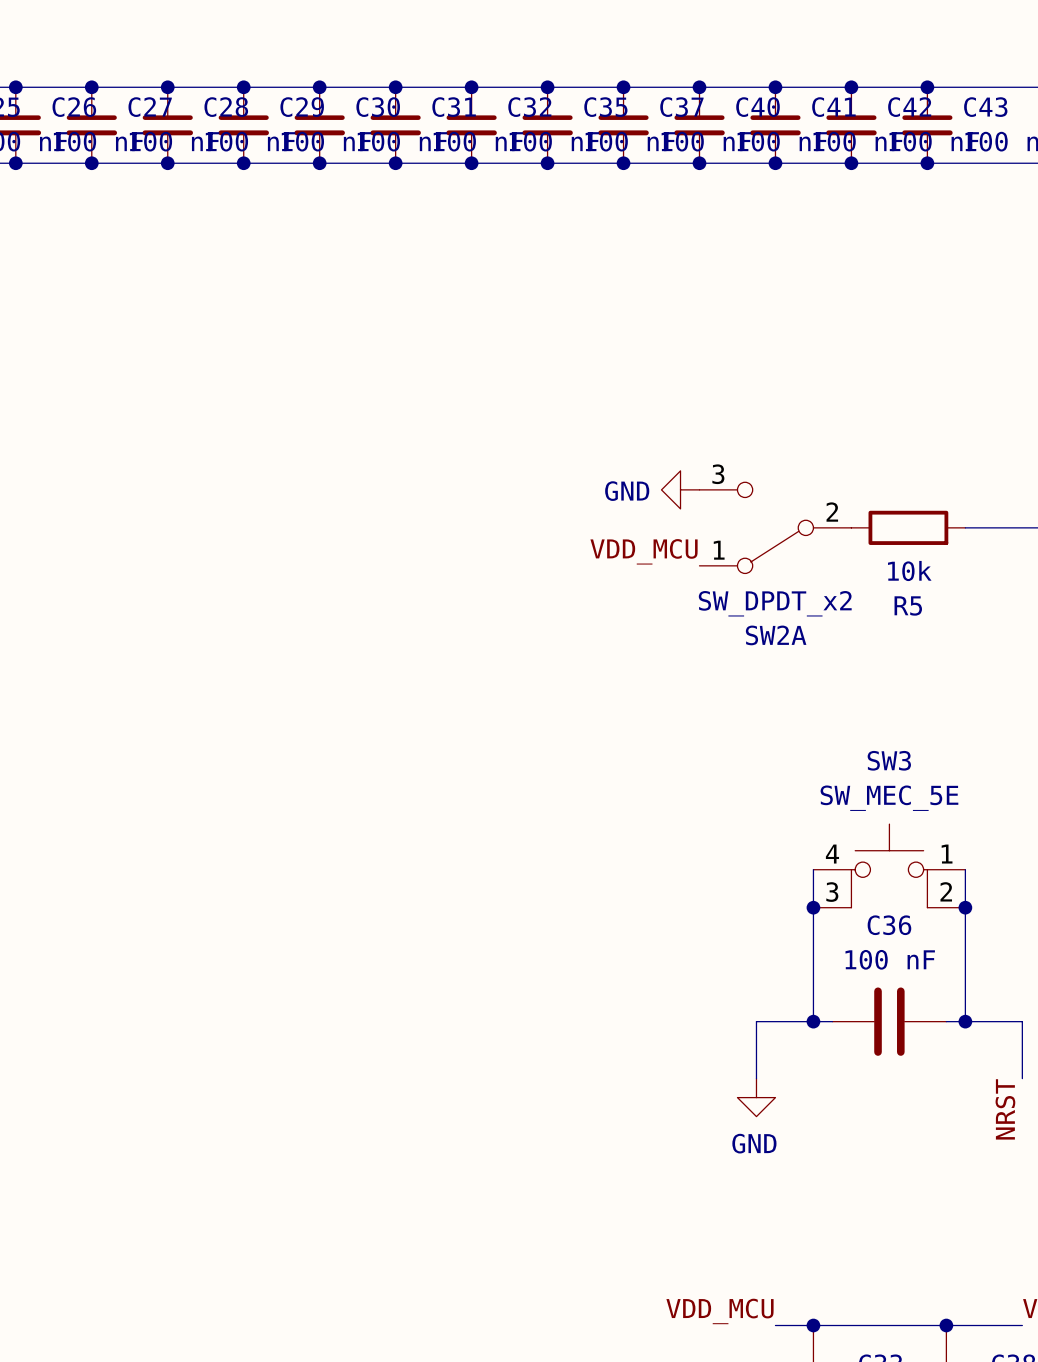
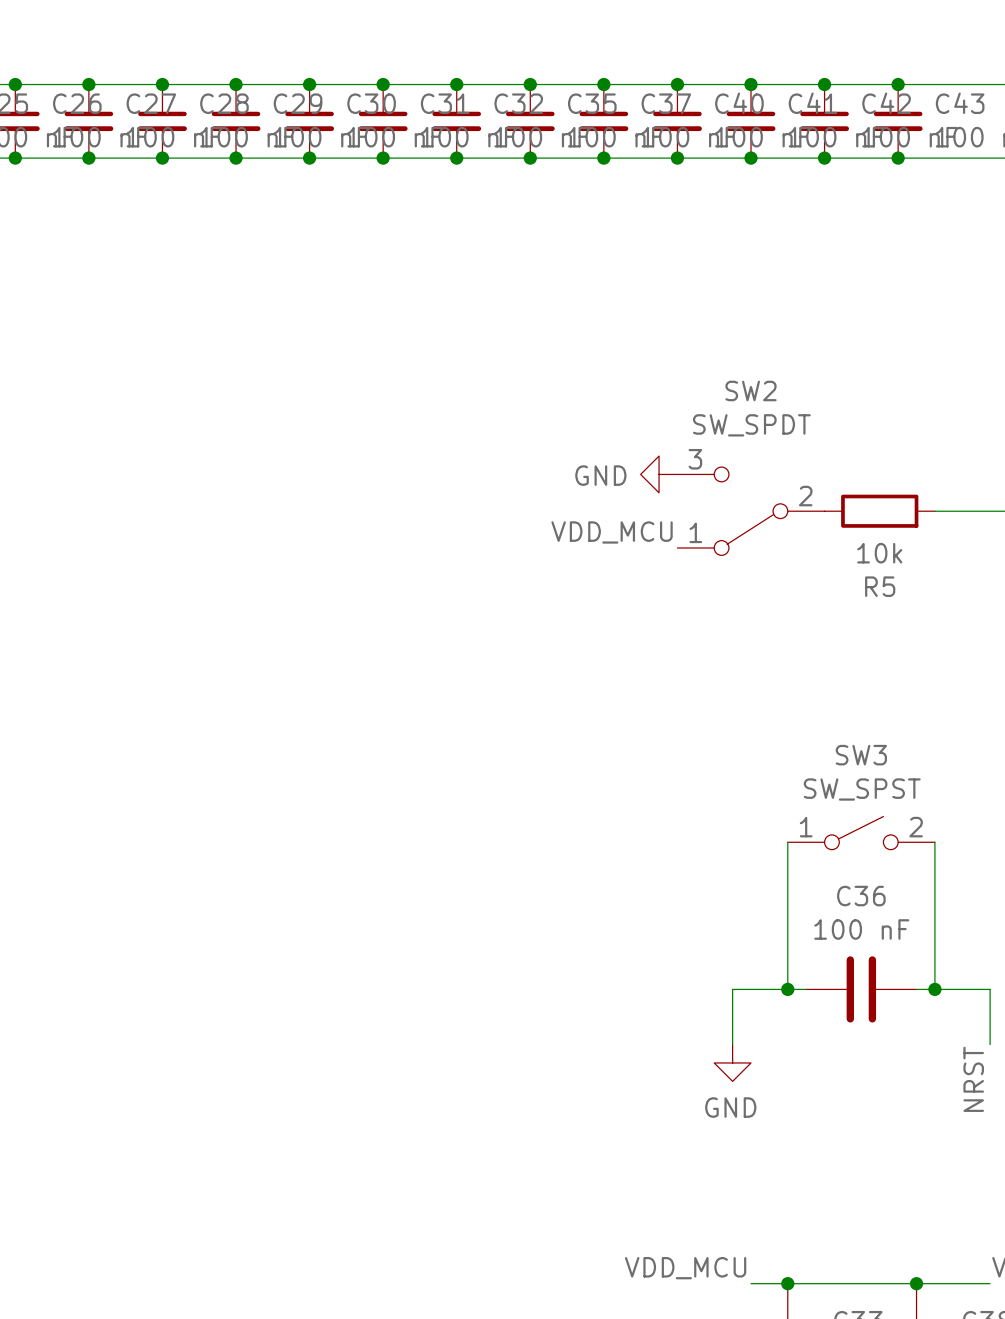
SW2A value: SW_DPDT_x2 (775, 603) -> SW_SPDT (751, 425)
SW2A name: SW2A (776, 635) -> SW2 (751, 390)
SW3 value: SW_MEC_5E (889, 798) -> SW_SPST (862, 789)
SW3 symbol: [813, 824, 966, 908] -> [787, 816, 935, 850]
junction: (813, 907) -> none
junction: (965, 907) -> none

